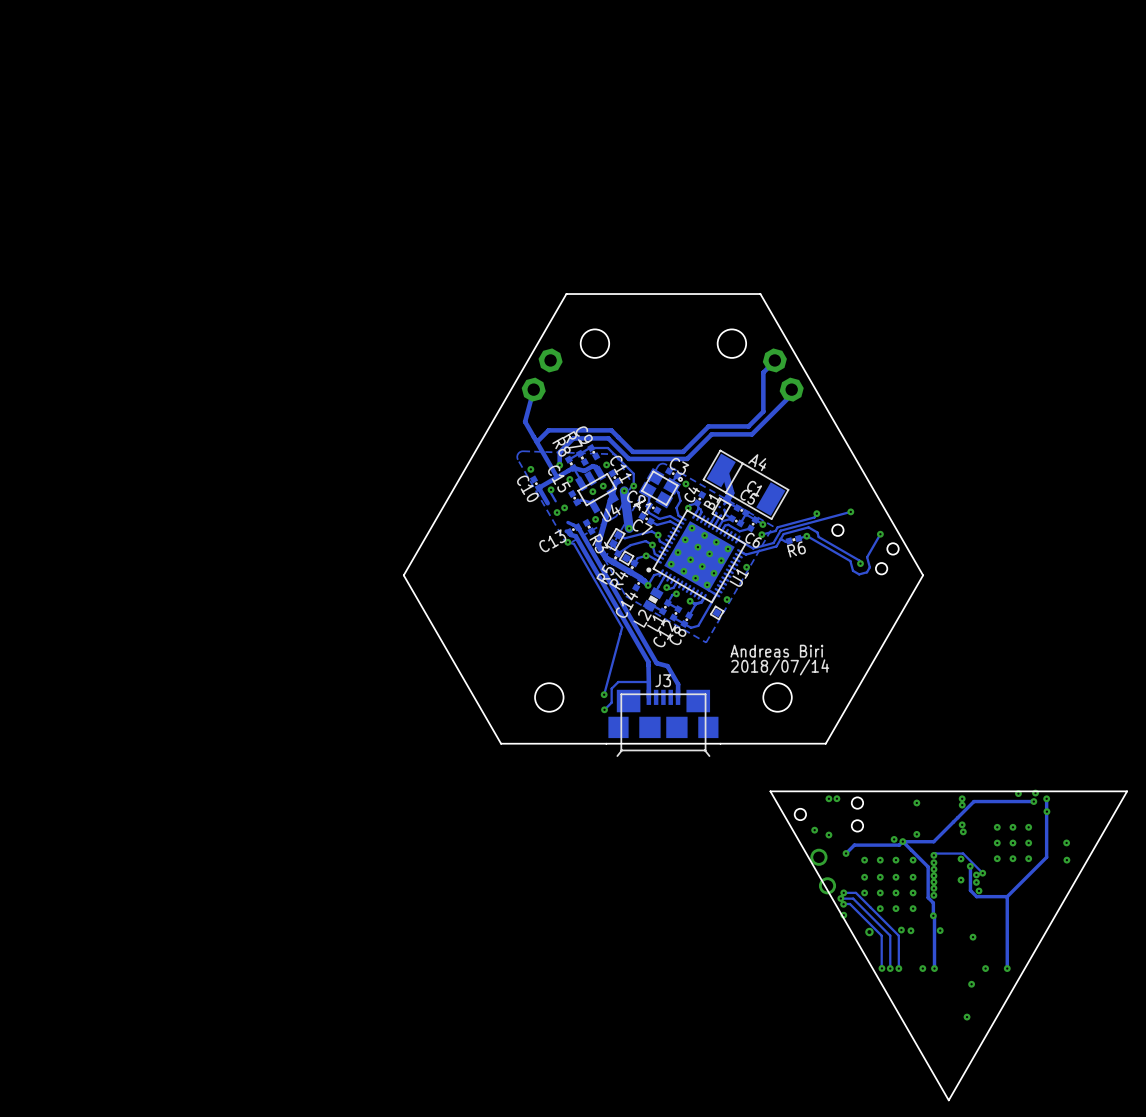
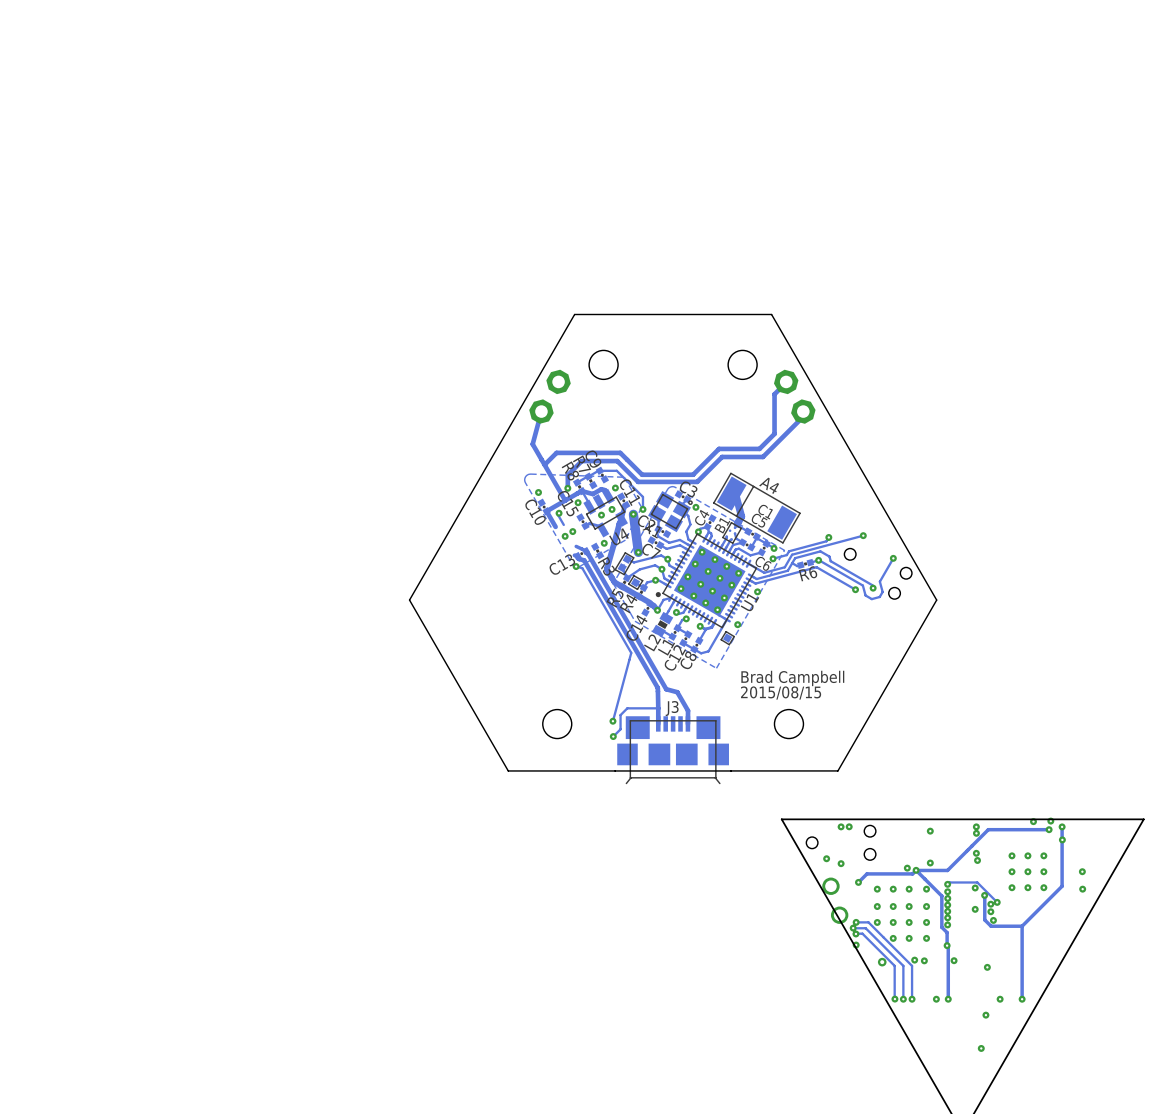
track: none -> (749, 580) (755, 583) (816, 567) (855, 589)
via: none -> (855, 589)
text: Andreas Biri (776, 651) -> Brad Campbell (792, 678)
text: 2018/07/14 (780, 667) -> 2015/08/15 (781, 693)

